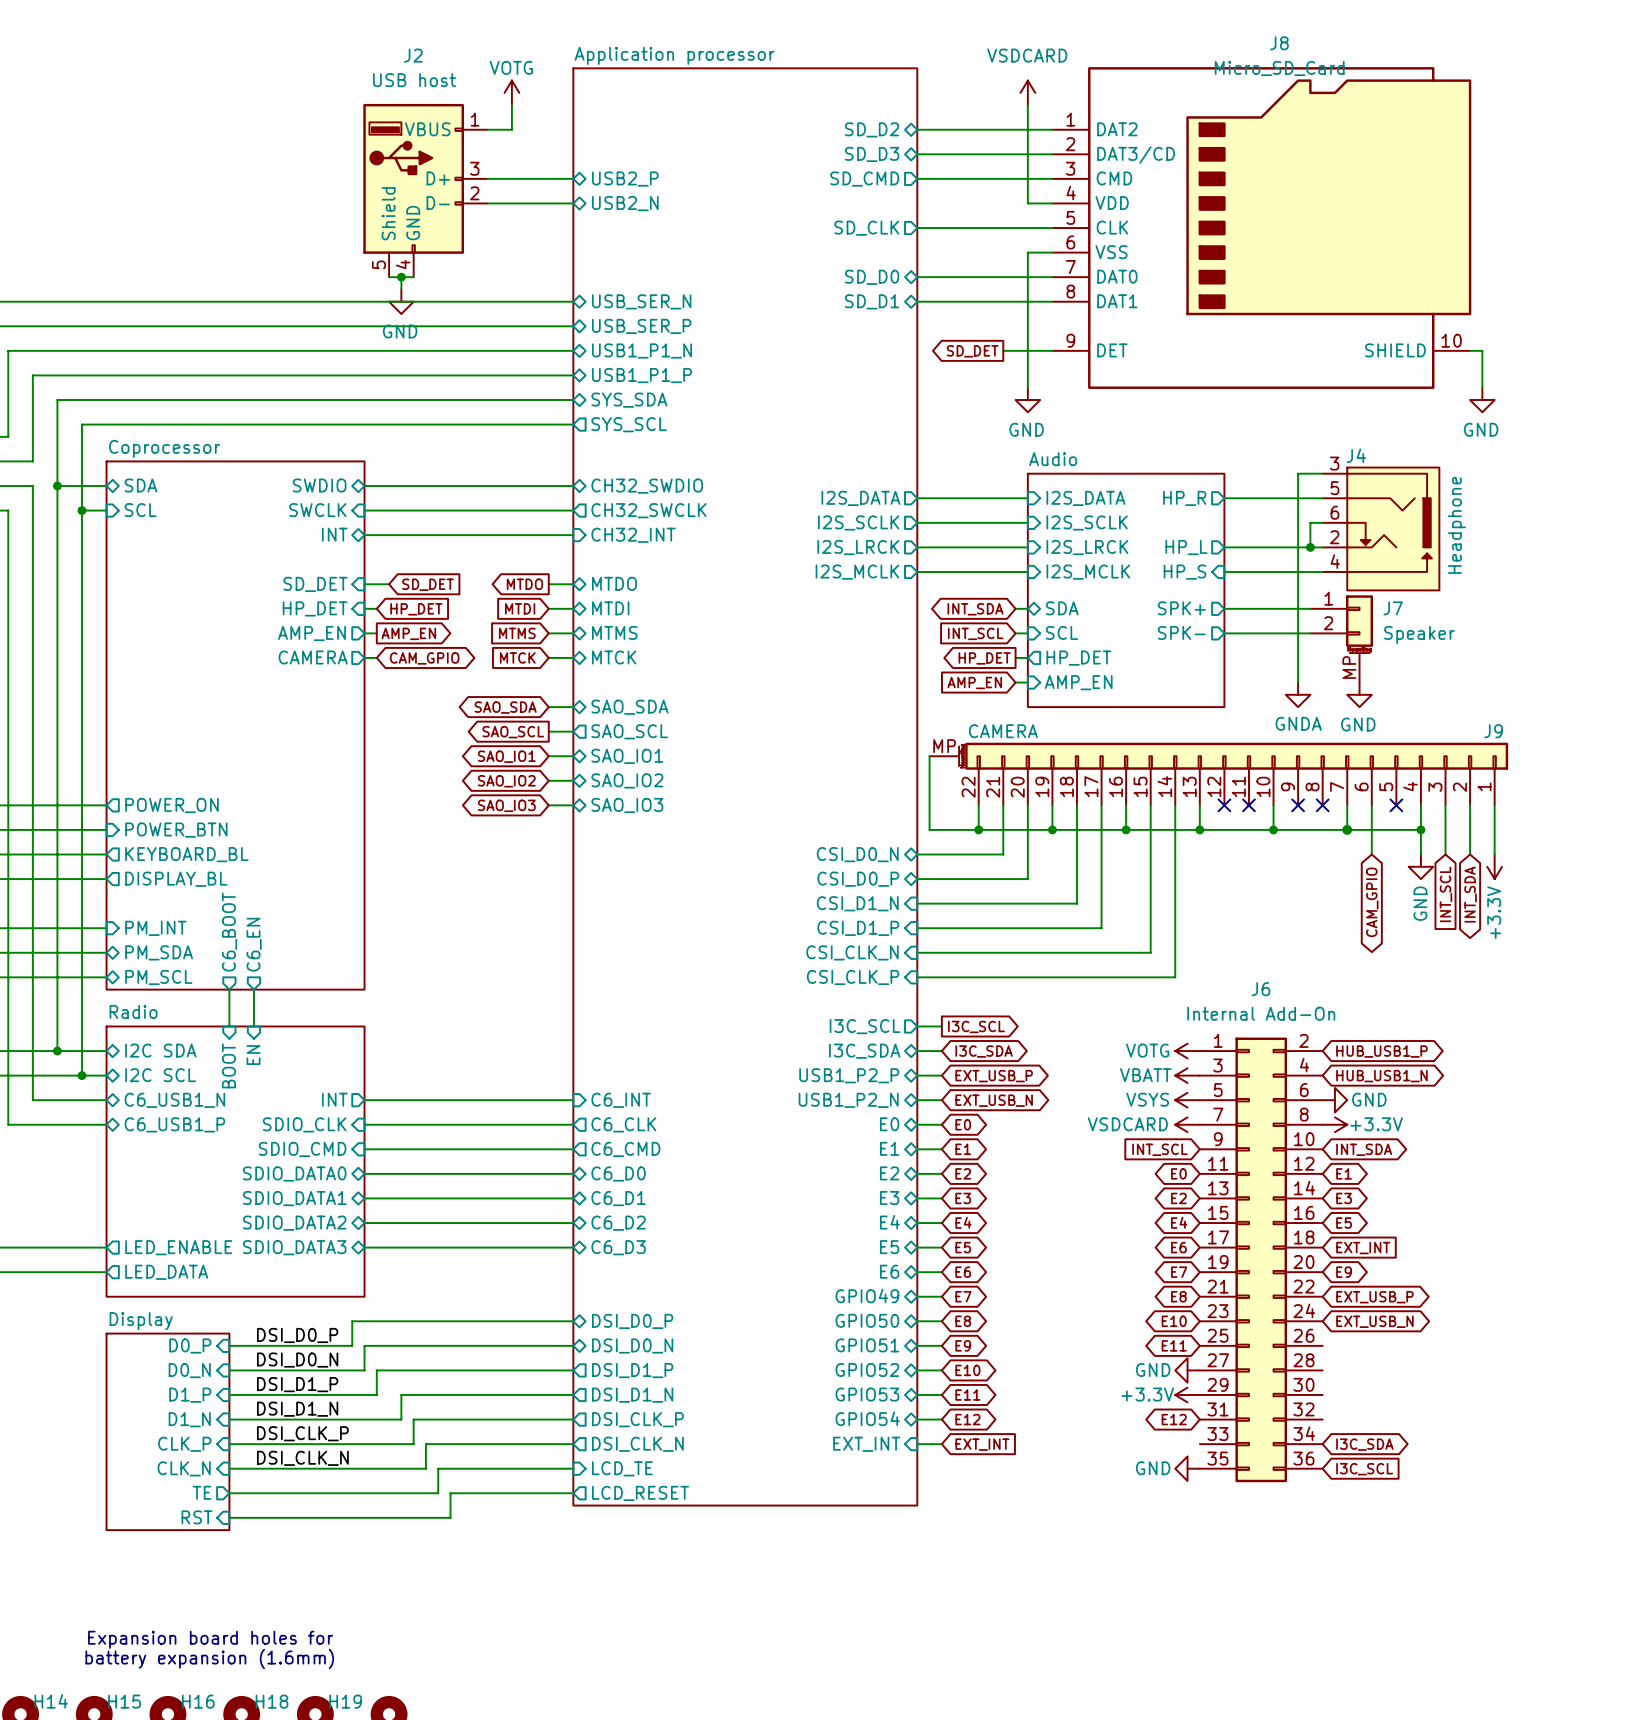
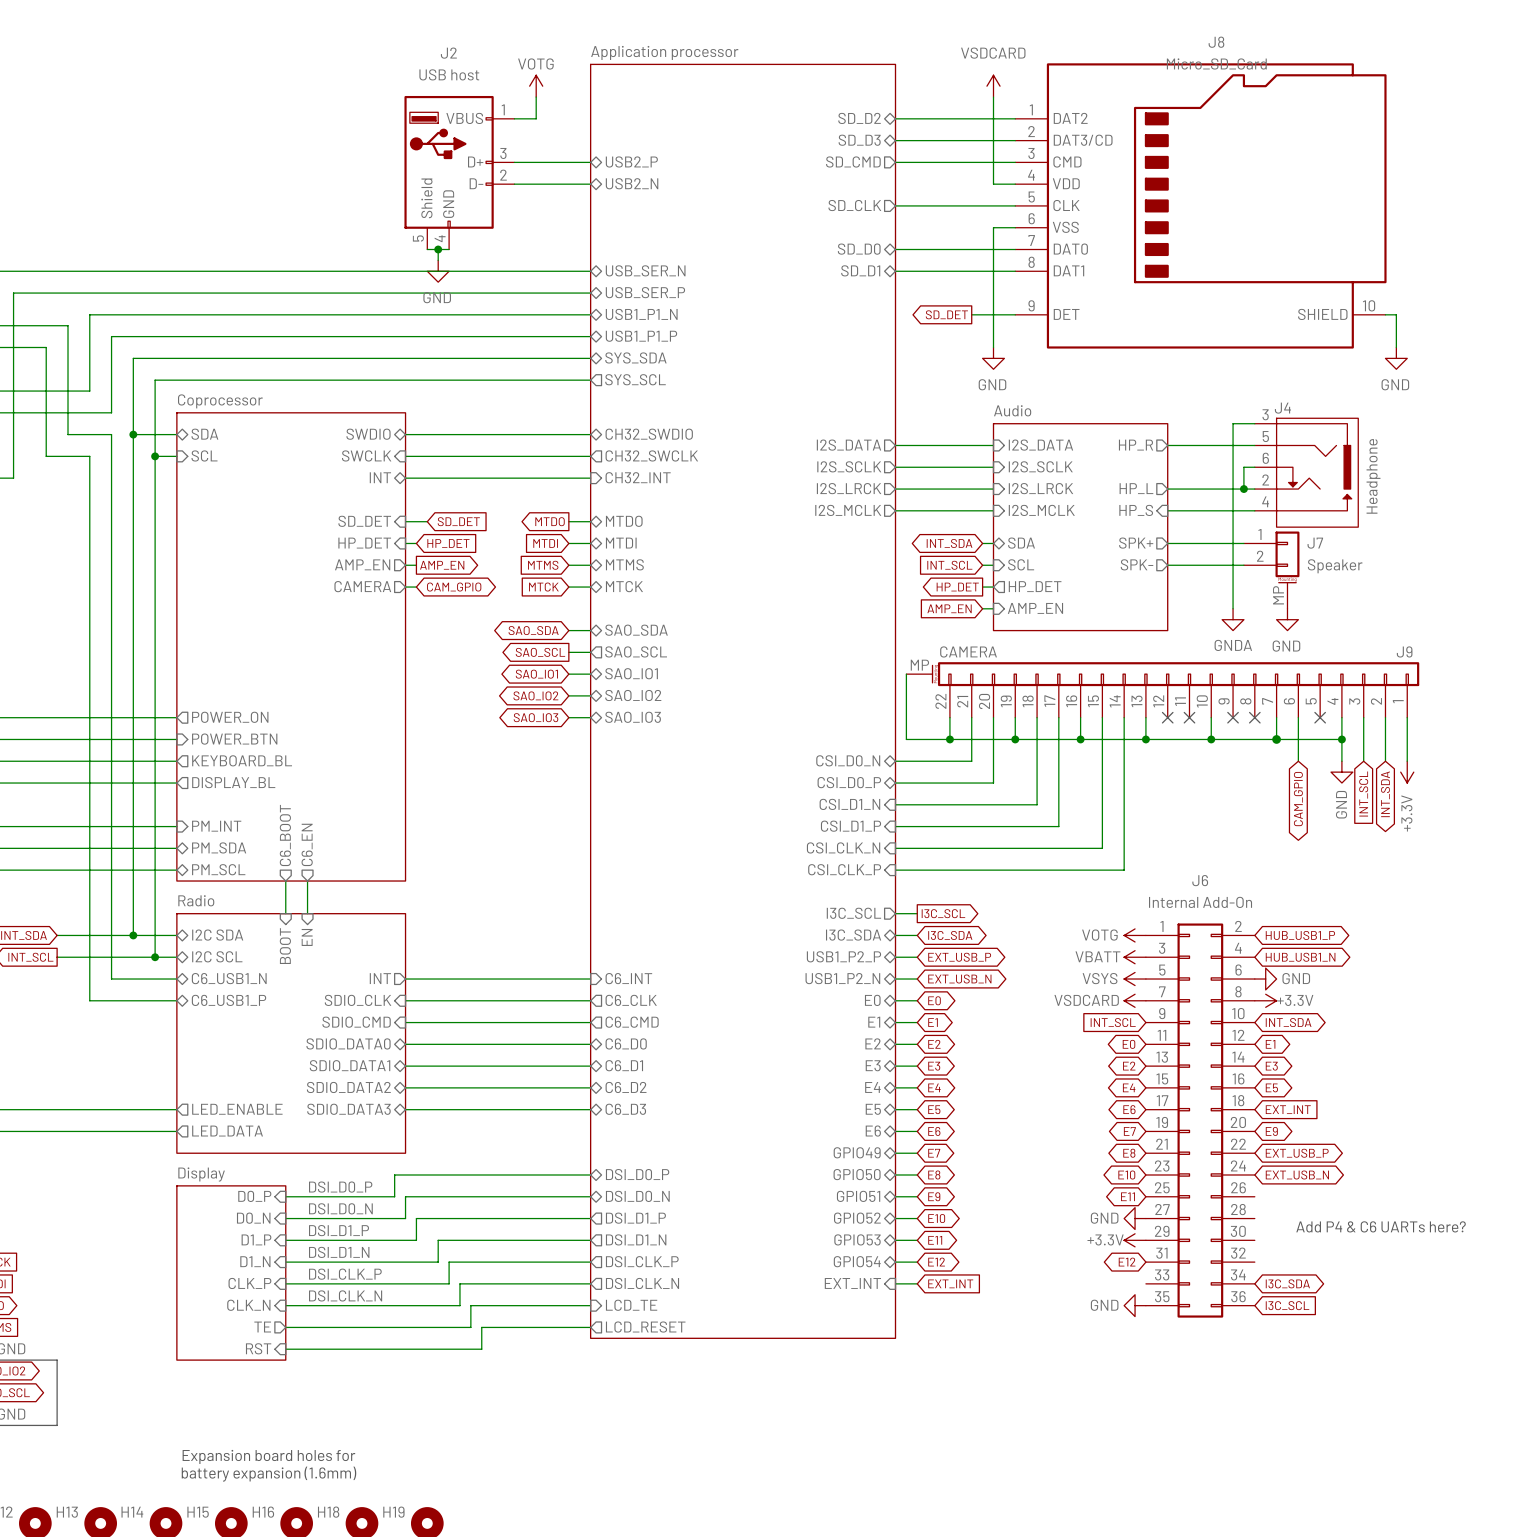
text: none -> Add P4 & C6 UARTs here? (1381, 1226)

